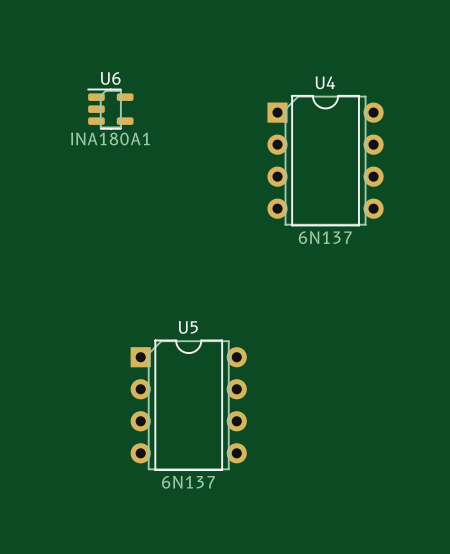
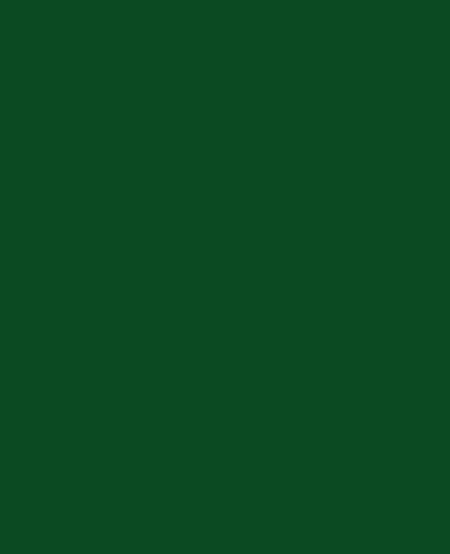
U6: INA180A1 (110, 109) -> none
U4: 6N137 (325, 160) -> none
U5: 6N137 (188, 405) -> none

